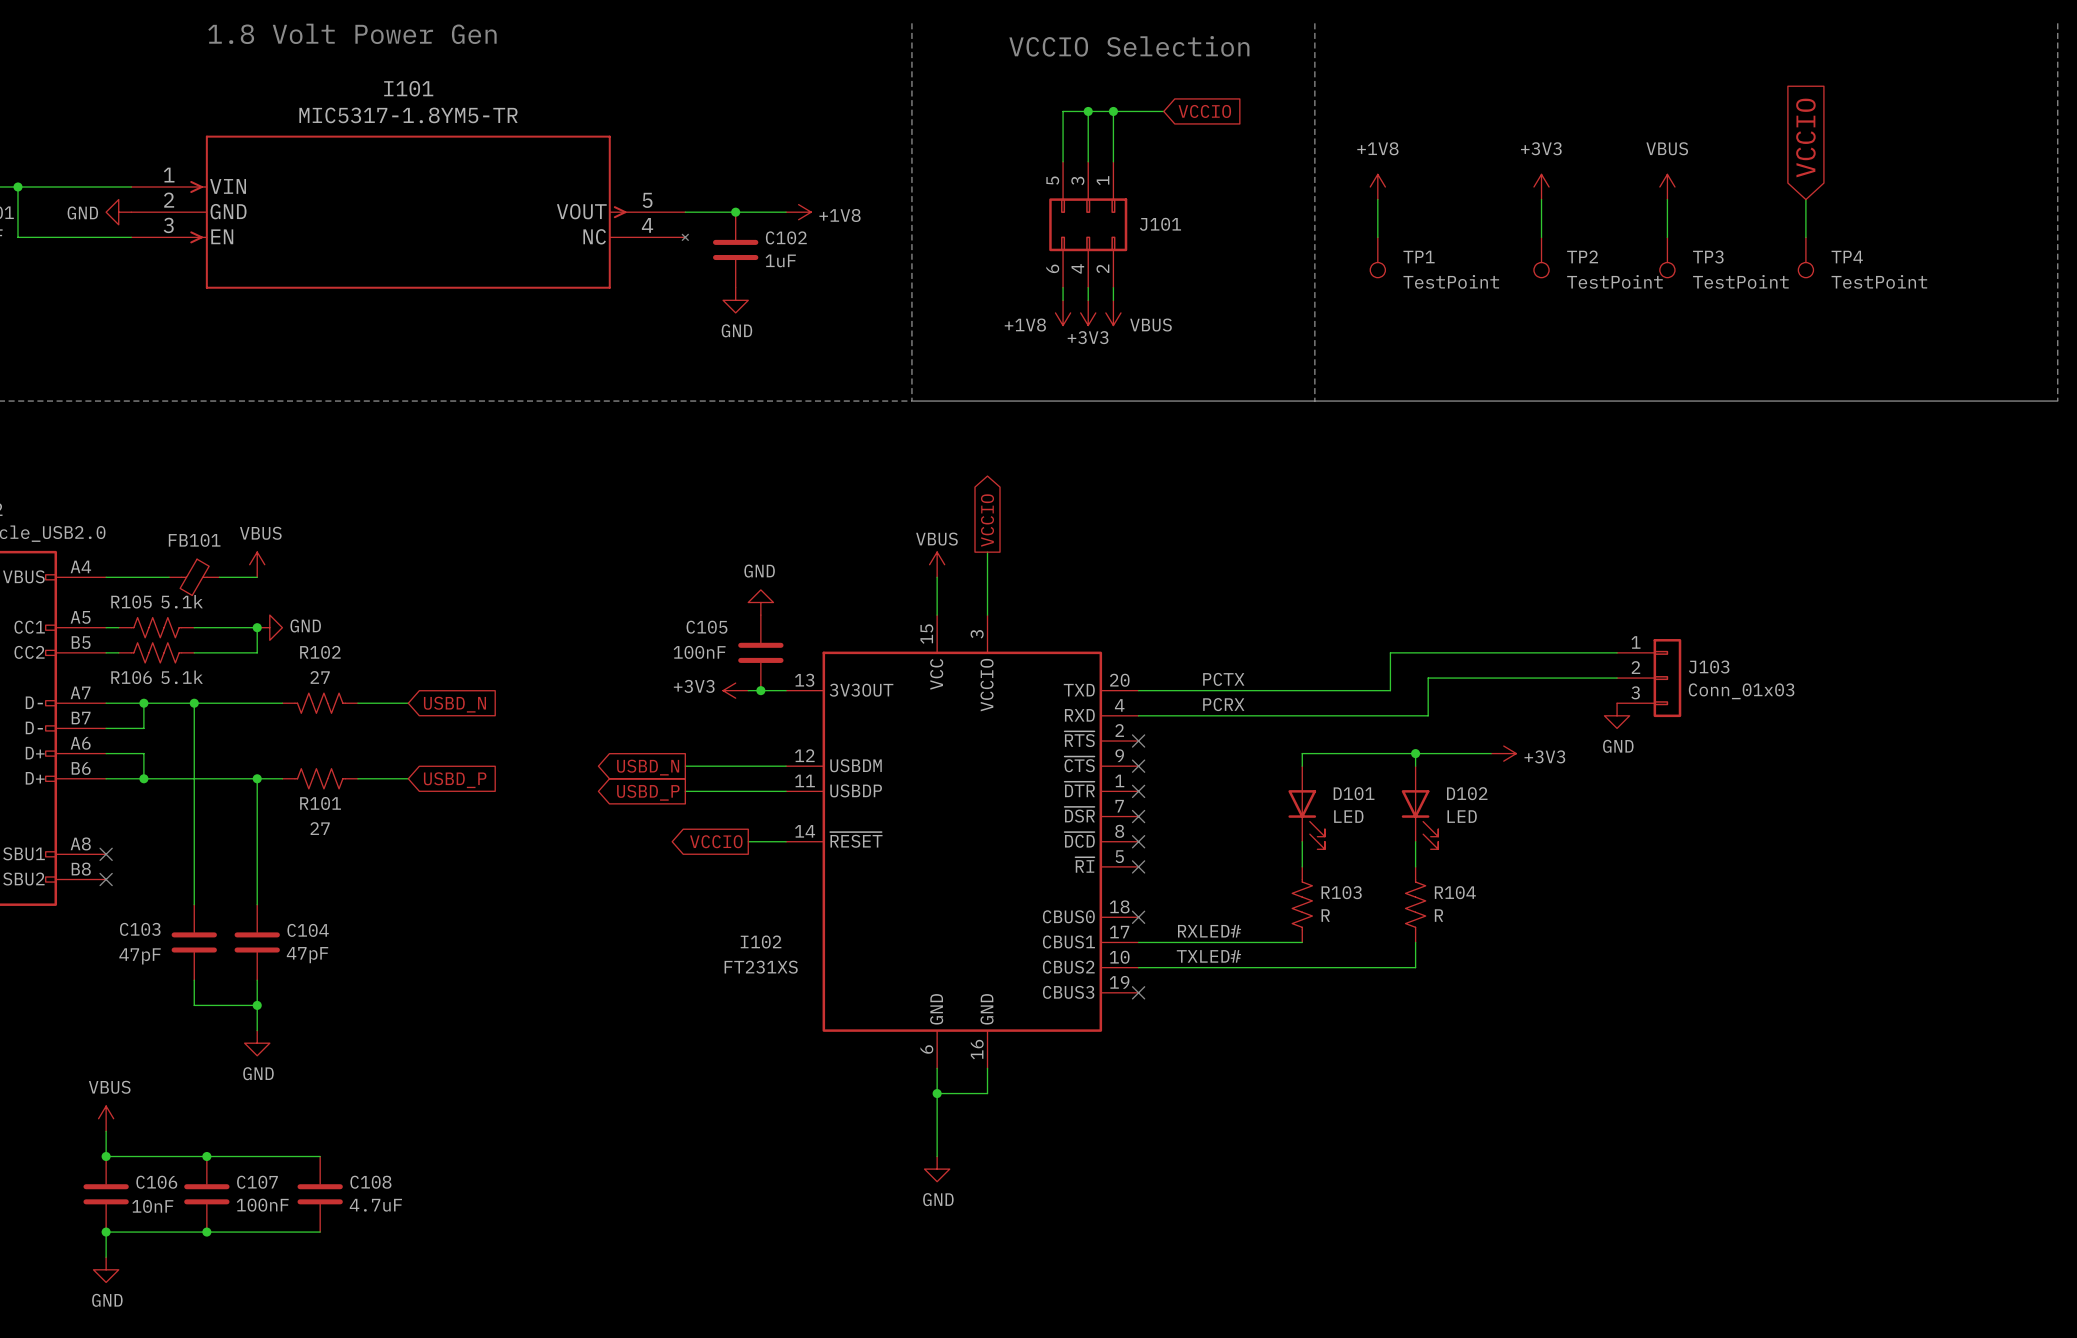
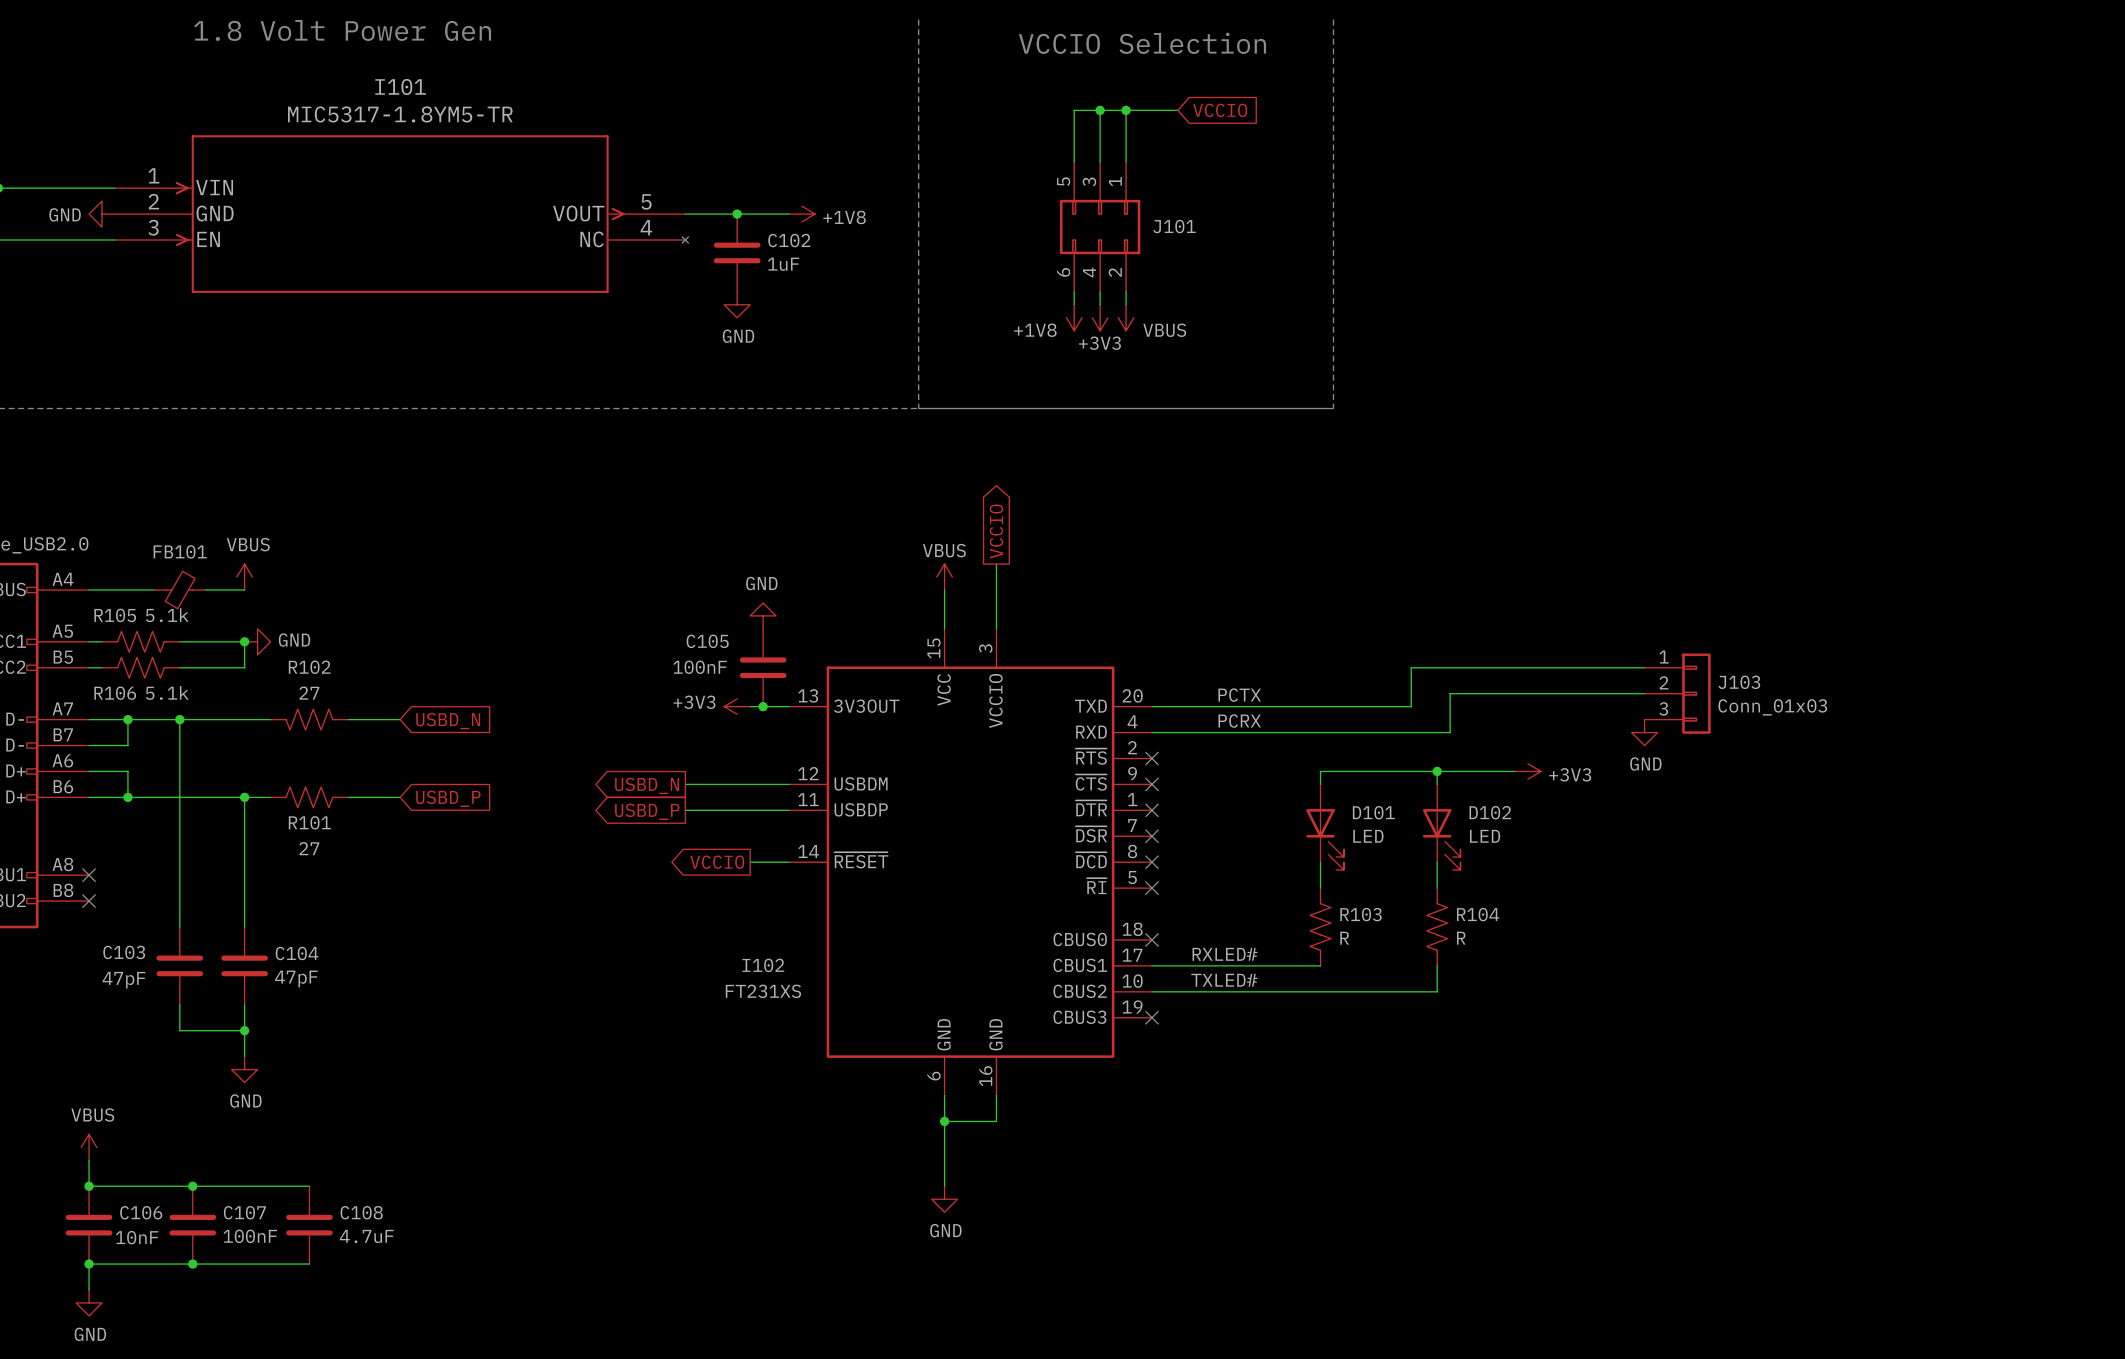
line: (2057, 23) (2057, 401) (1314, 401) -> none
global label: VCCIO (1805, 138) -> none
power symbol: +1V8 (1377, 187) -> none
power symbol: +3V3 (1541, 187) -> none
power symbol: VBUS (1667, 187) -> none
wire: (1377, 199) (1377, 237) -> none
wire: (1541, 199) (1541, 237) -> none
wire: (1667, 199) (1667, 237) -> none
wire: (1805, 199) (1805, 237) -> none
TP1: TestPoint (1377, 257) -> none
TP2: TestPoint (1541, 257) -> none
TP3: TestPoint (1667, 257) -> none
TP4: TestPoint (1805, 257) -> none

